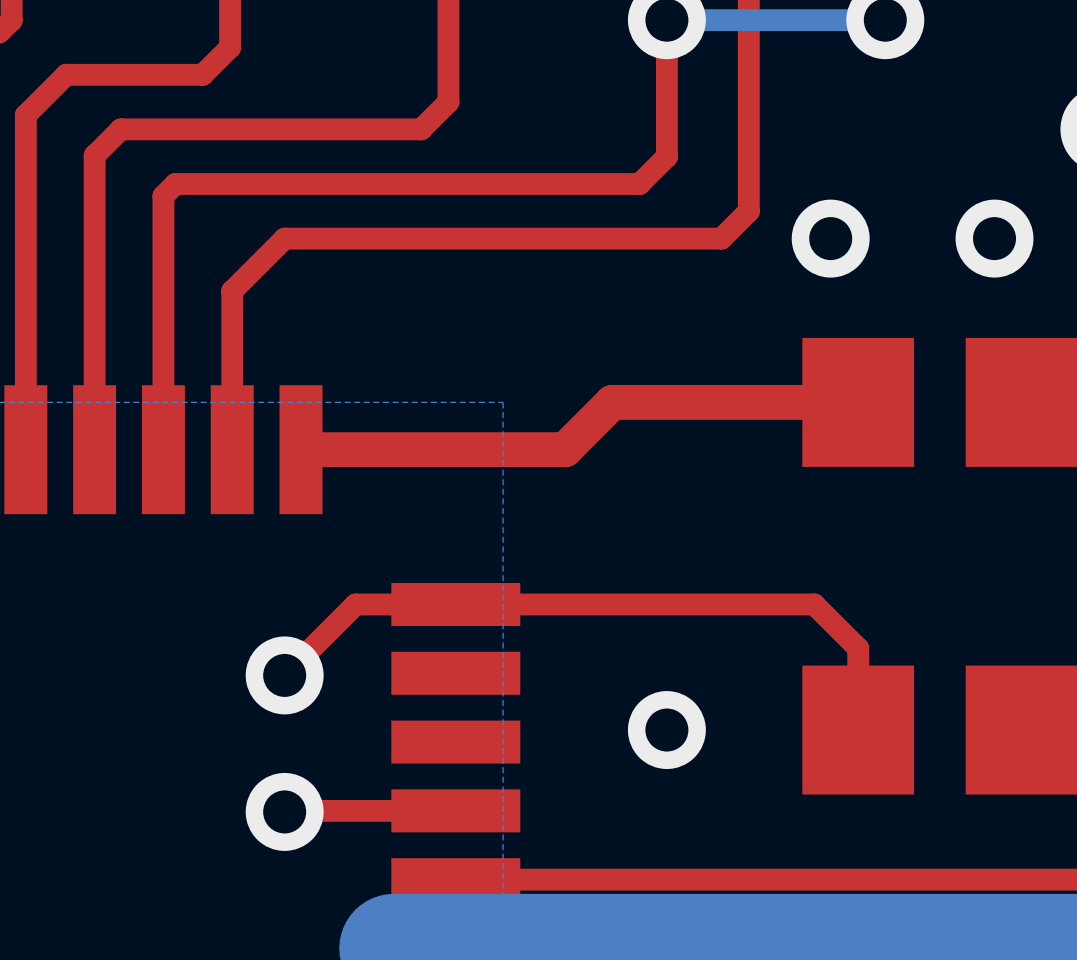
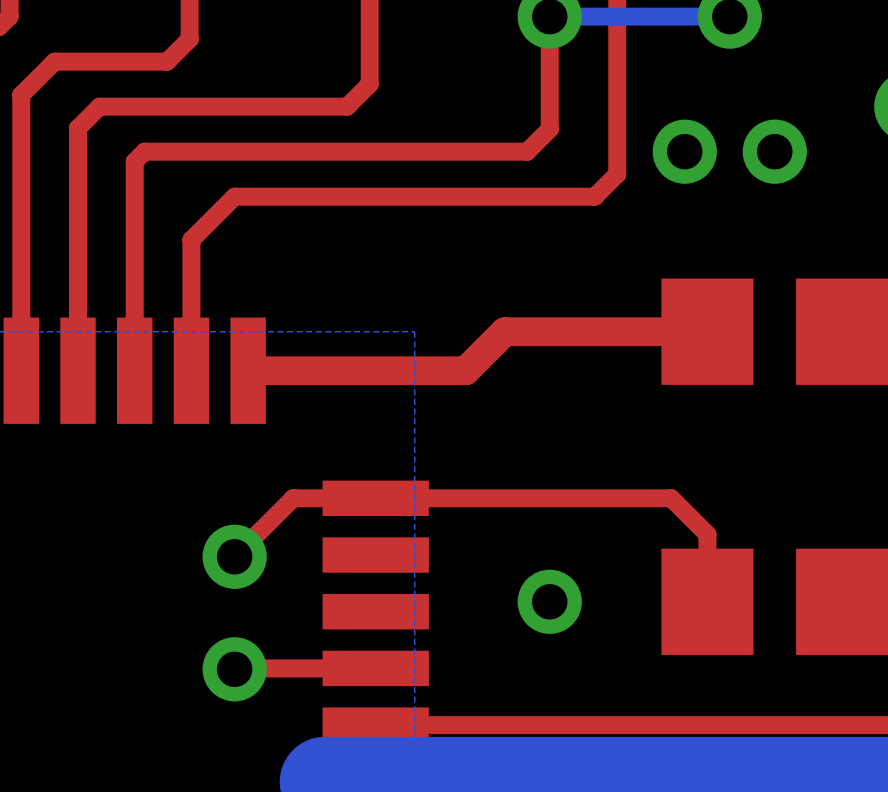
via position: (830, 238) -> (684, 151)
via position: (994, 238) -> (774, 151)

